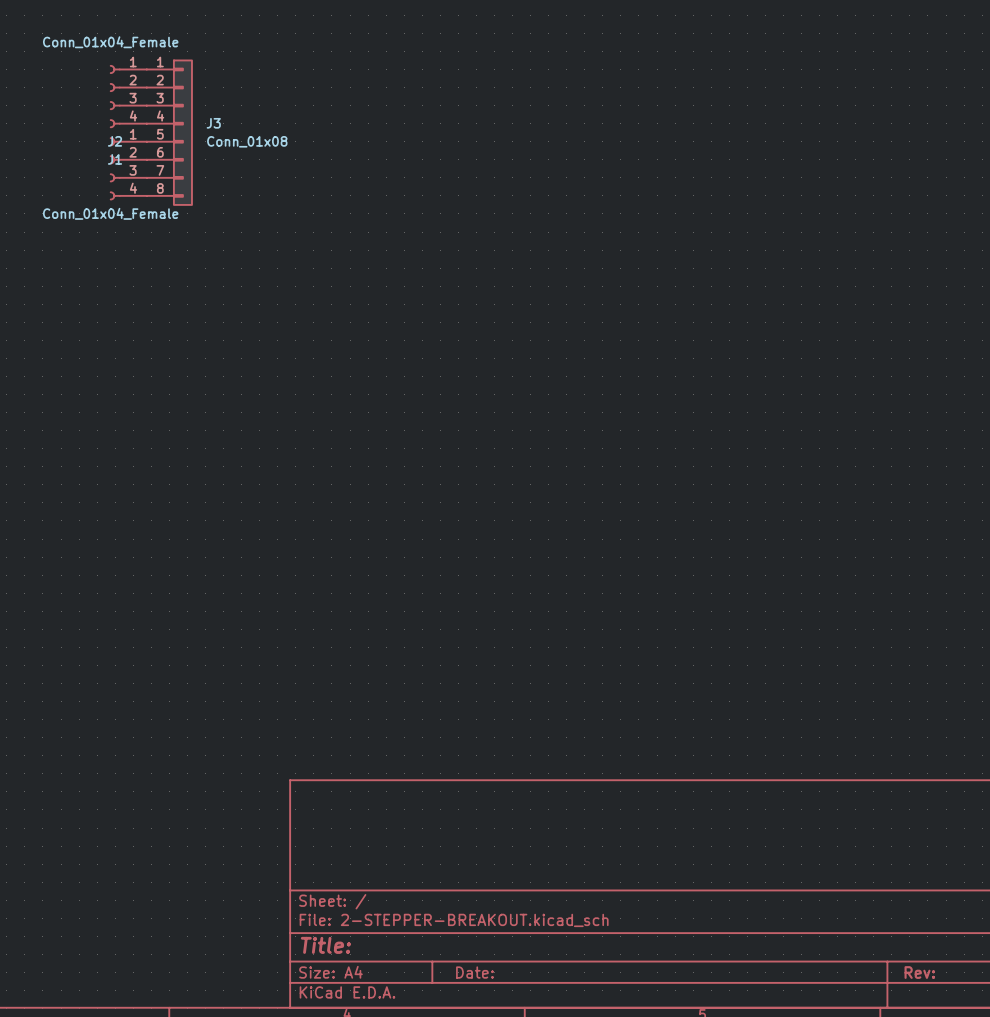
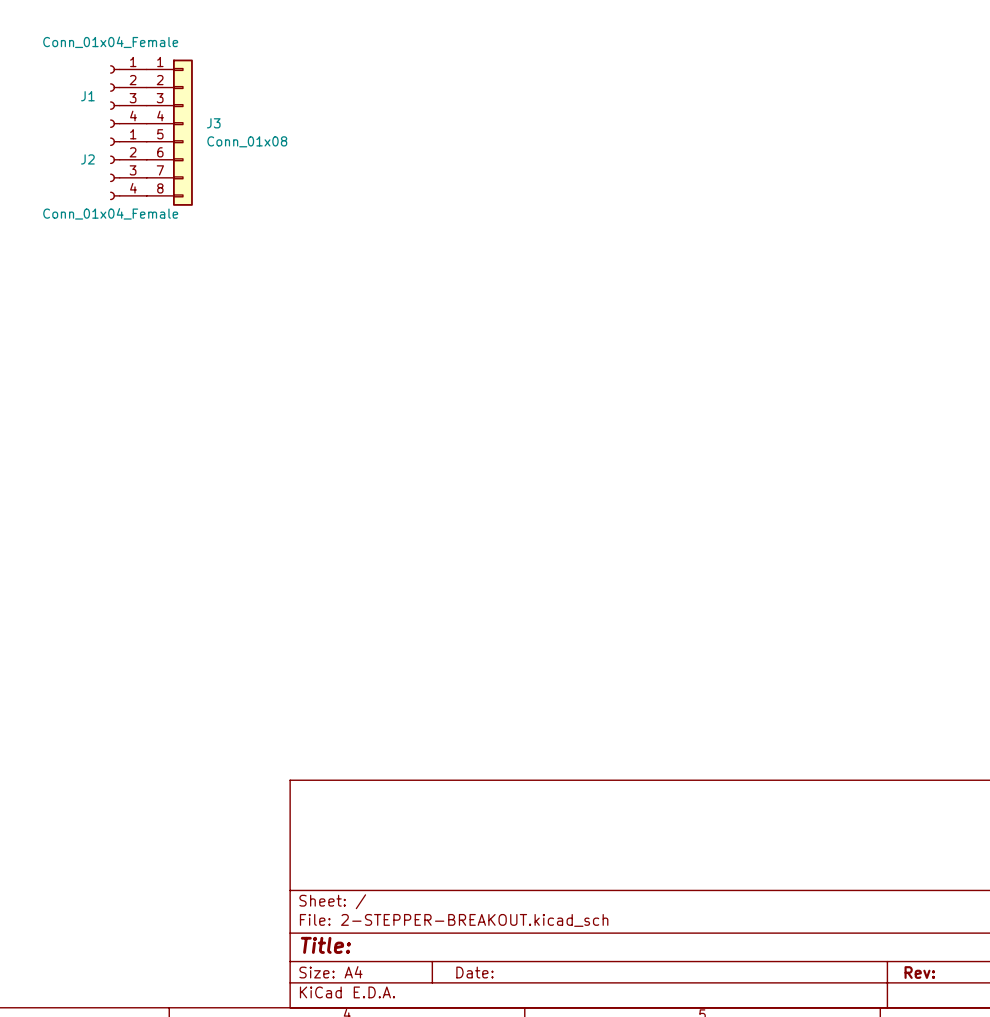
J2 name position: J2 (115, 141) -> J2 (87, 159)
J1 name position: J1 (115, 159) -> J1 (87, 96)

